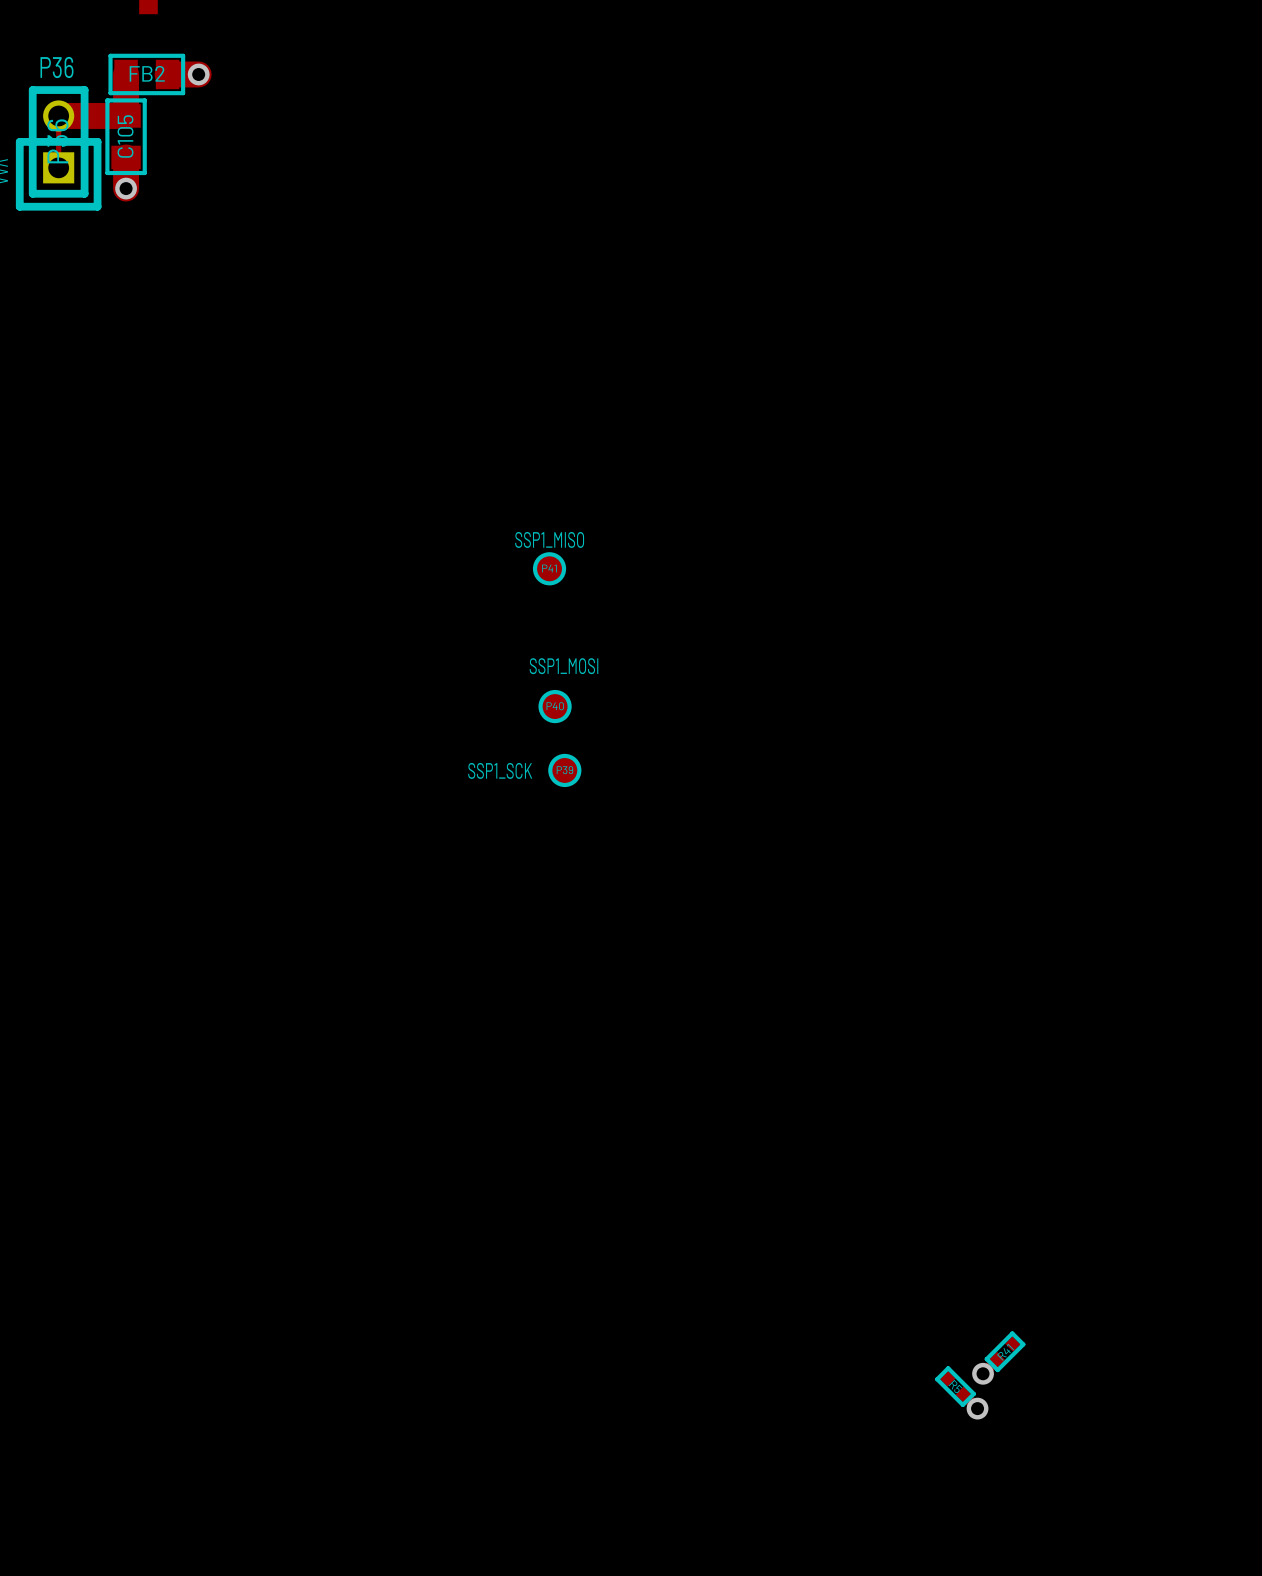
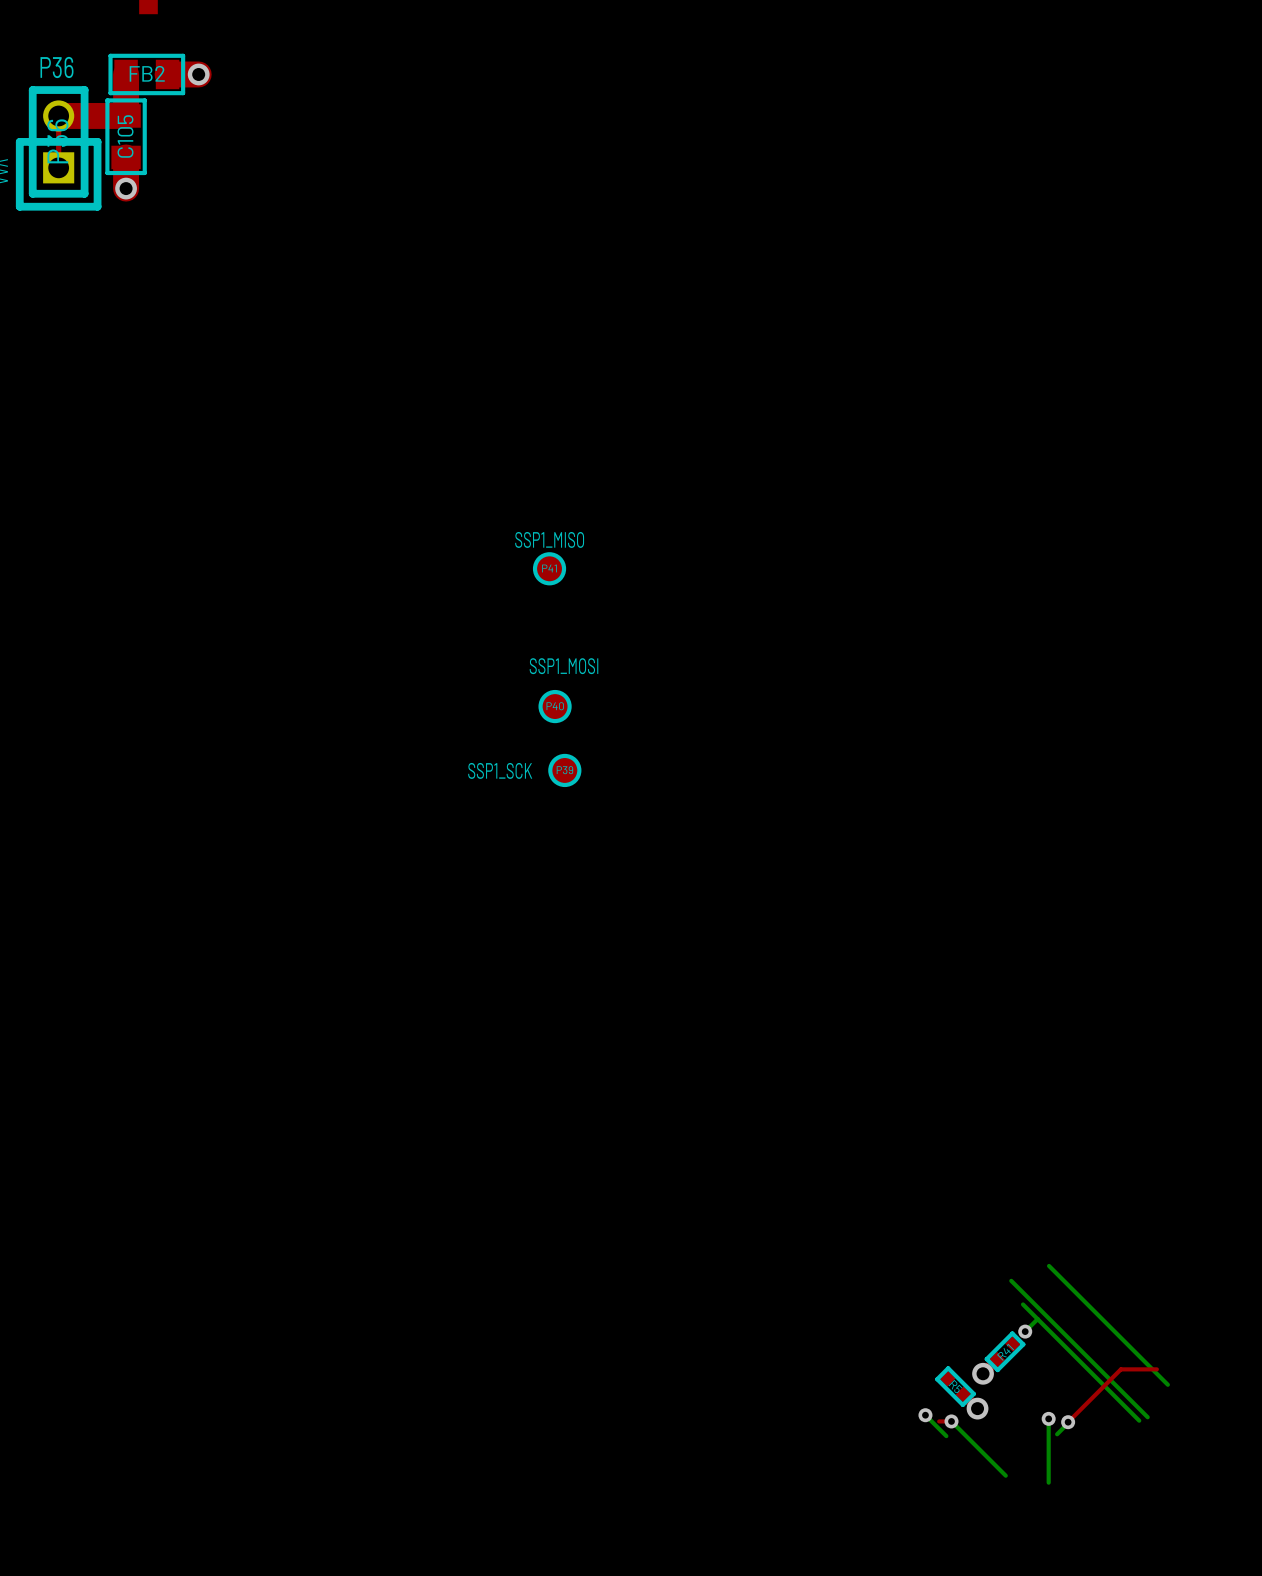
bottom track: none -> (1049, 1265) (1167, 1384)
bottom track: none -> (1011, 1280) (1147, 1417)
bottom track: none -> (1023, 1304) (1139, 1420)
bottom track: none -> (1037, 1319) (1025, 1331)
via: none -> (1025, 1331)
top track: none -> (1156, 1369) (1120, 1369) (1068, 1422)
bottom track: none -> (925, 1415) (946, 1436)
via: none -> (925, 1415)
bottom track: none -> (1048, 1418) (1048, 1482)
via: none -> (1048, 1418)
top track: none -> (939, 1421) (951, 1421)
bottom track: none -> (951, 1421) (1005, 1475)
via: none -> (951, 1421)
bottom track: none -> (1068, 1422) (1057, 1434)
via: none -> (1068, 1422)

